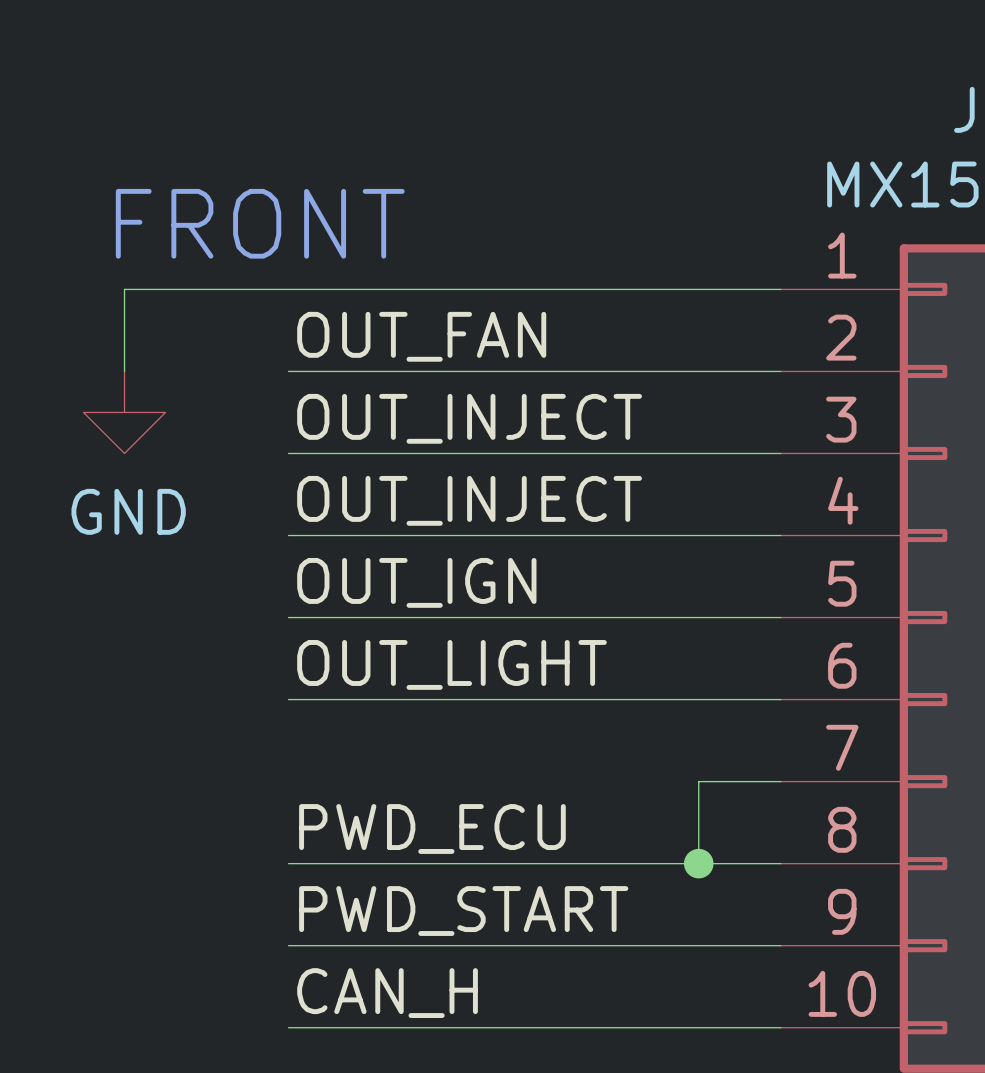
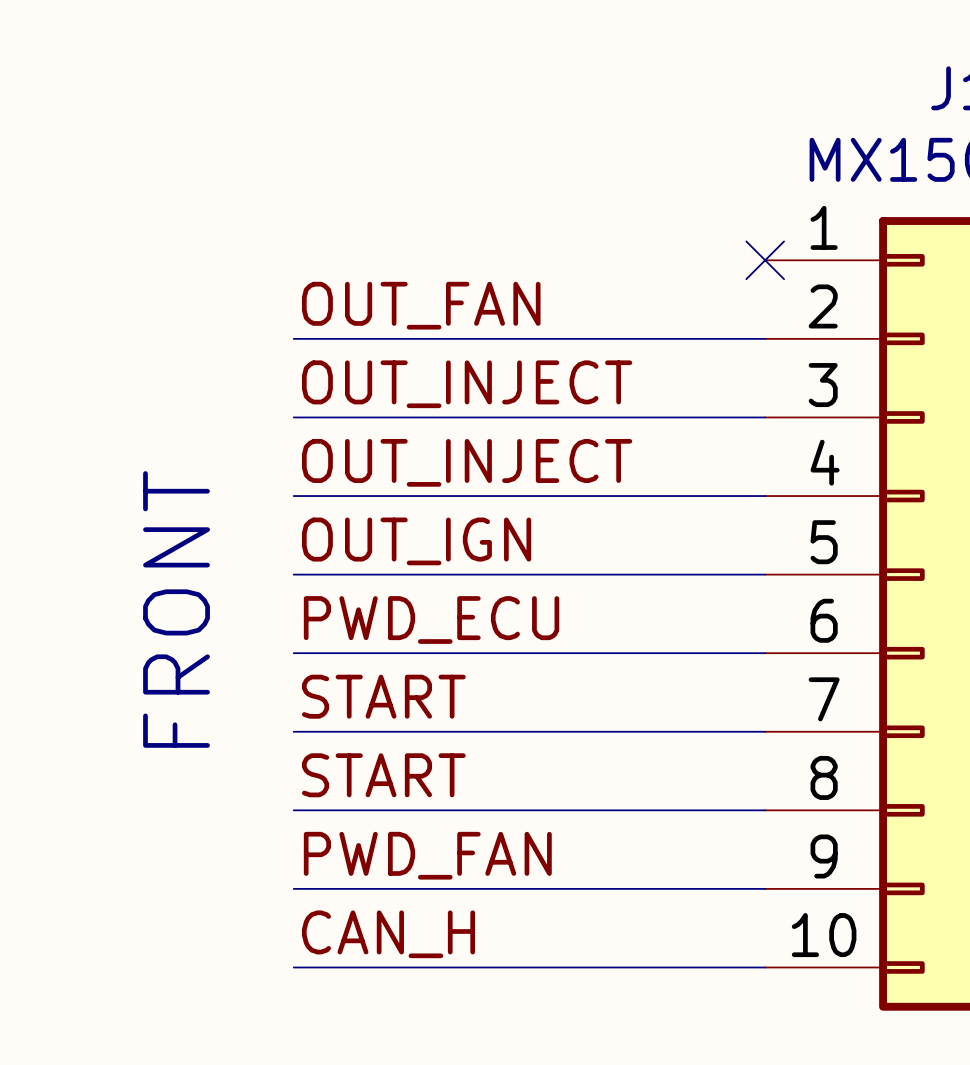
text rotation: 0° (260, 223) -> 90° counterclockwise (176, 609)
text position: FRONT (260, 223) -> FRONT (176, 609)
wire: (780, 289) (124, 289) (124, 371) -> none
no-connect mark: none -> (765, 260)
power symbol: GND (124, 412) -> none
label: OUT_LIGHT (451, 664) -> PWD_ECU (431, 619)
label: none -> START (383, 696)
wire: (698, 781) (698, 863) -> (686, 731) (293, 731)
label: PWD_ECU (432, 829) -> START (383, 775)
junction: (698, 863) -> none
label: PWD_START (463, 911) -> PWD_FAN (427, 855)

